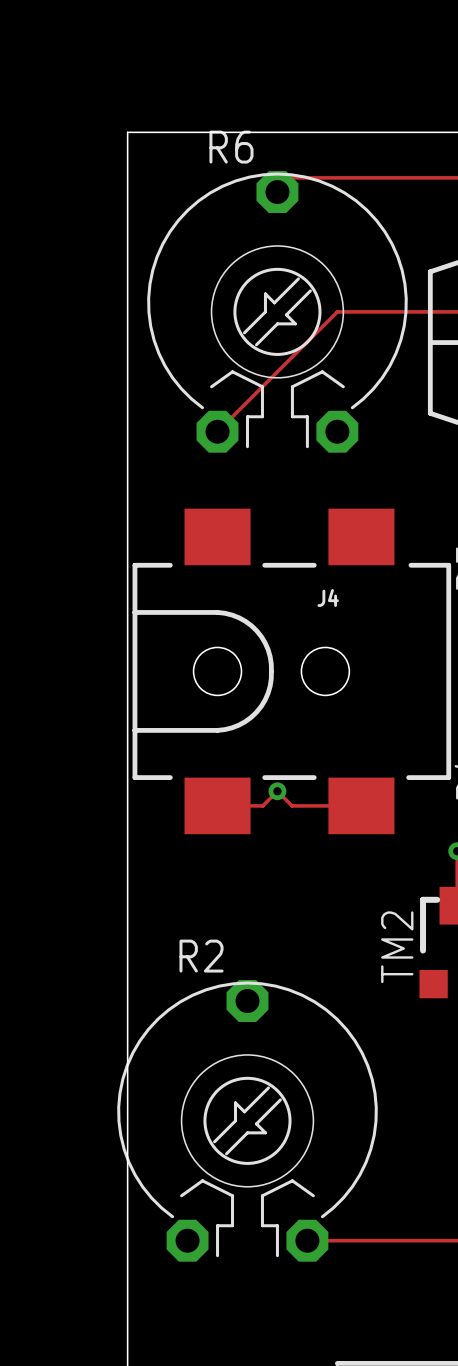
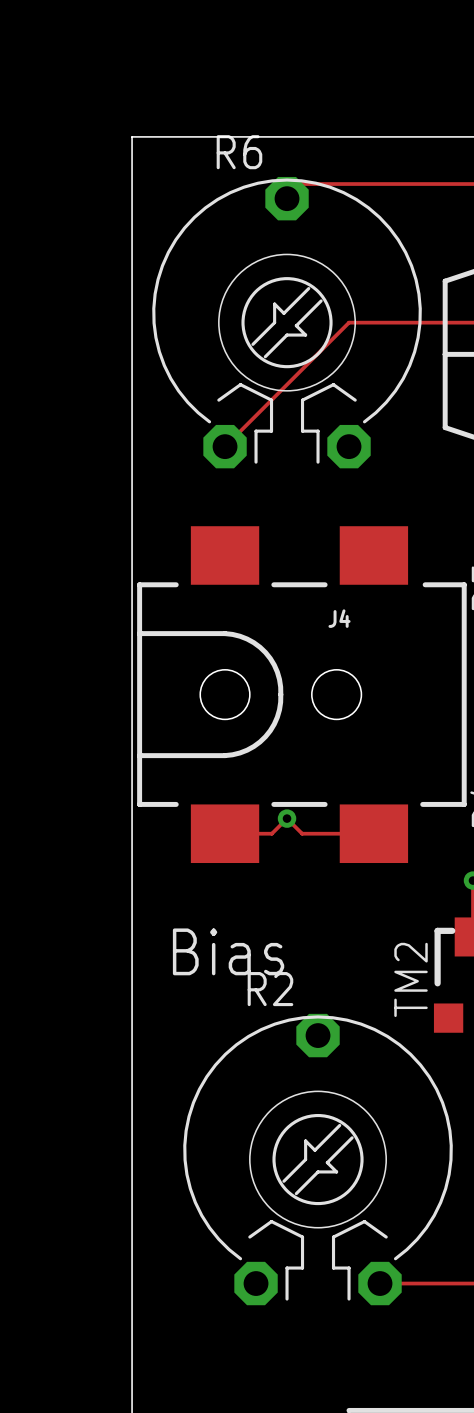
text: none -> Bias (228, 951)
R2 position: (247, 1120) -> (318, 1159)
track: (307, 1240) (367, 1240) -> none

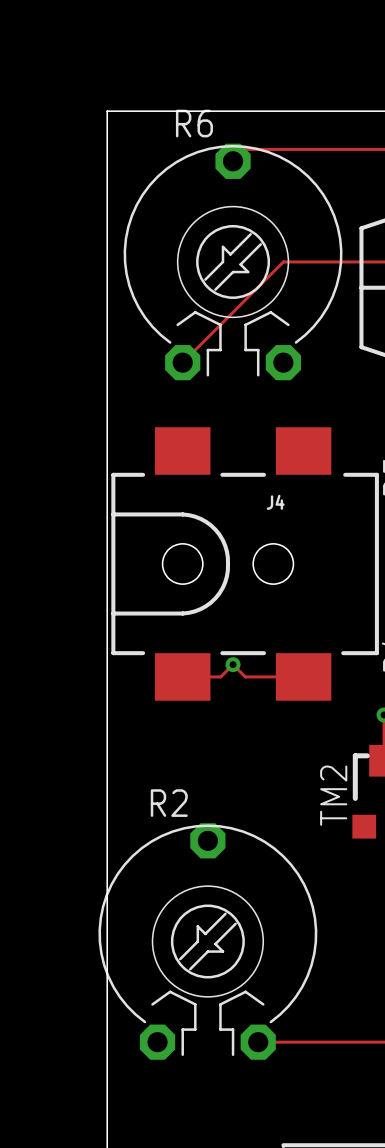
text: Bias (228, 951) -> none
R2 position: (318, 1159) -> (207, 941)
track: none -> (258, 1042) (308, 1042)

